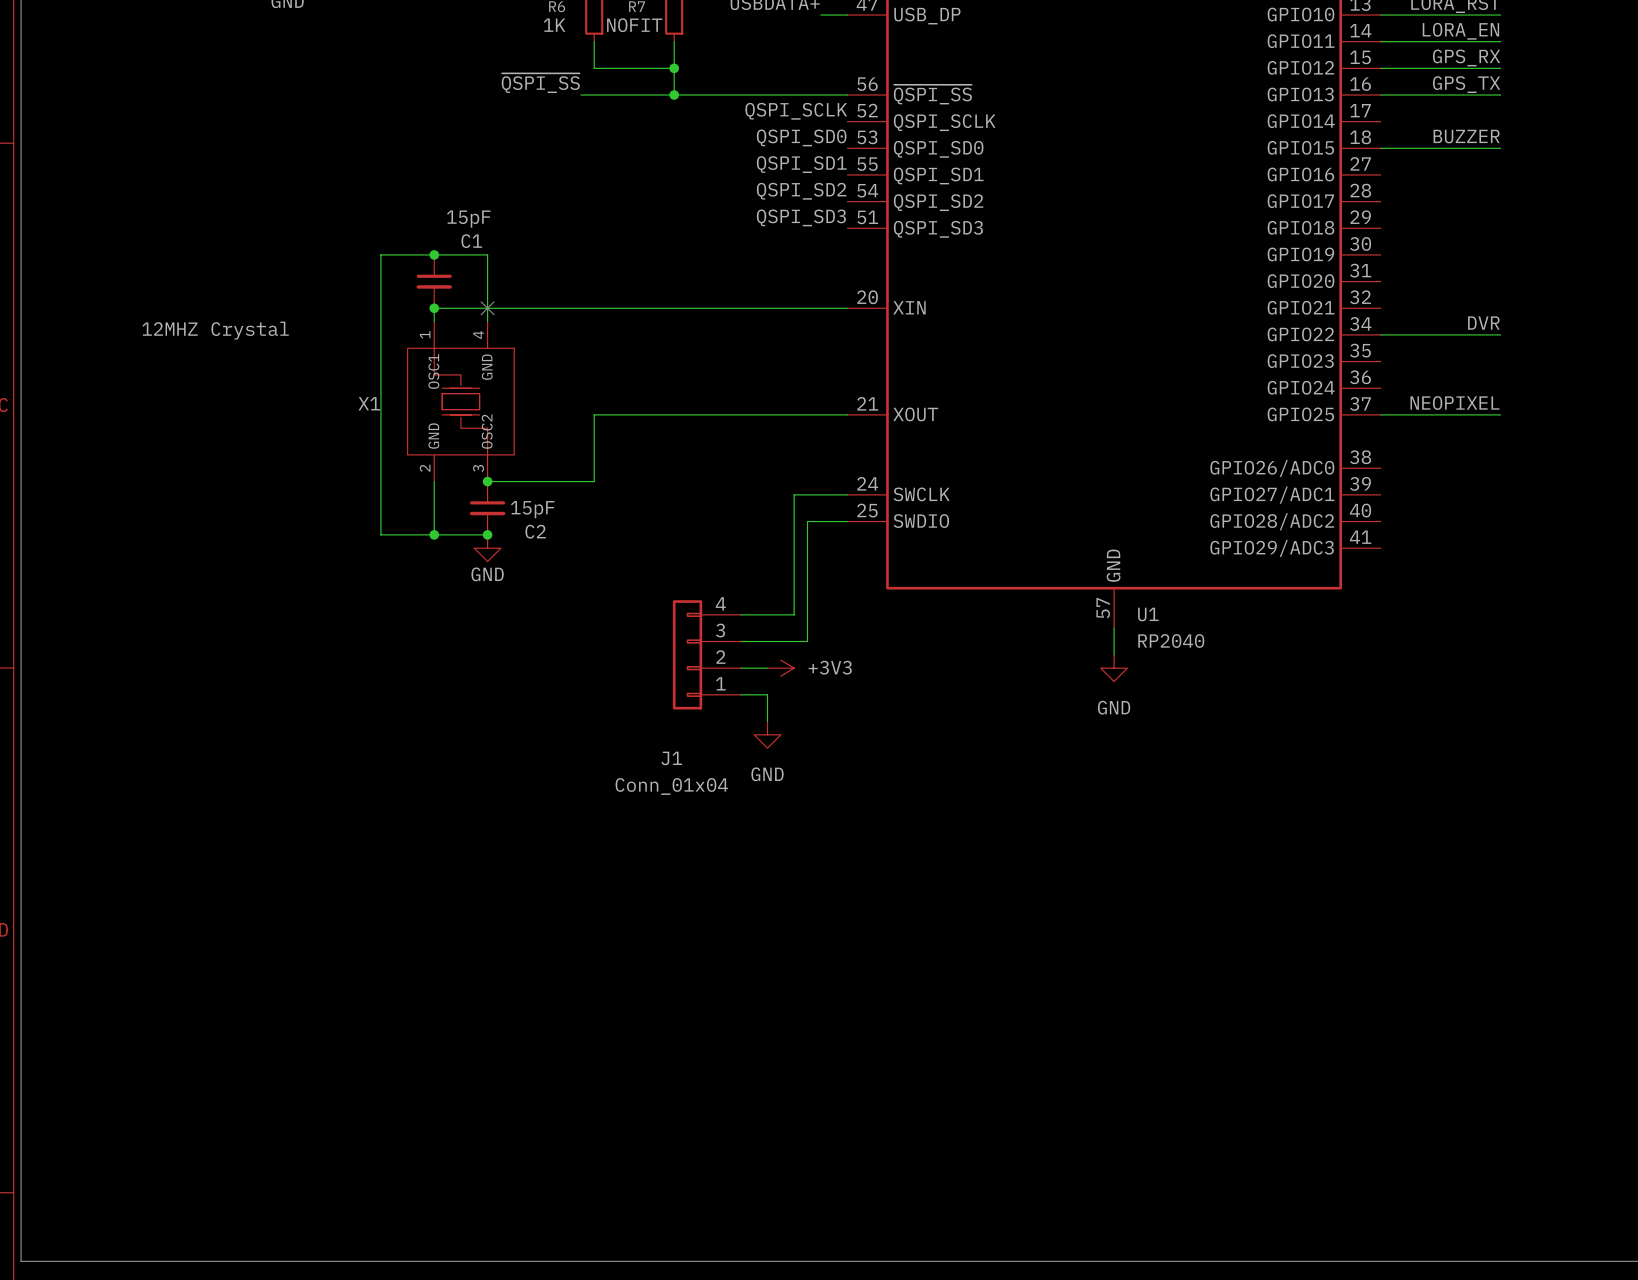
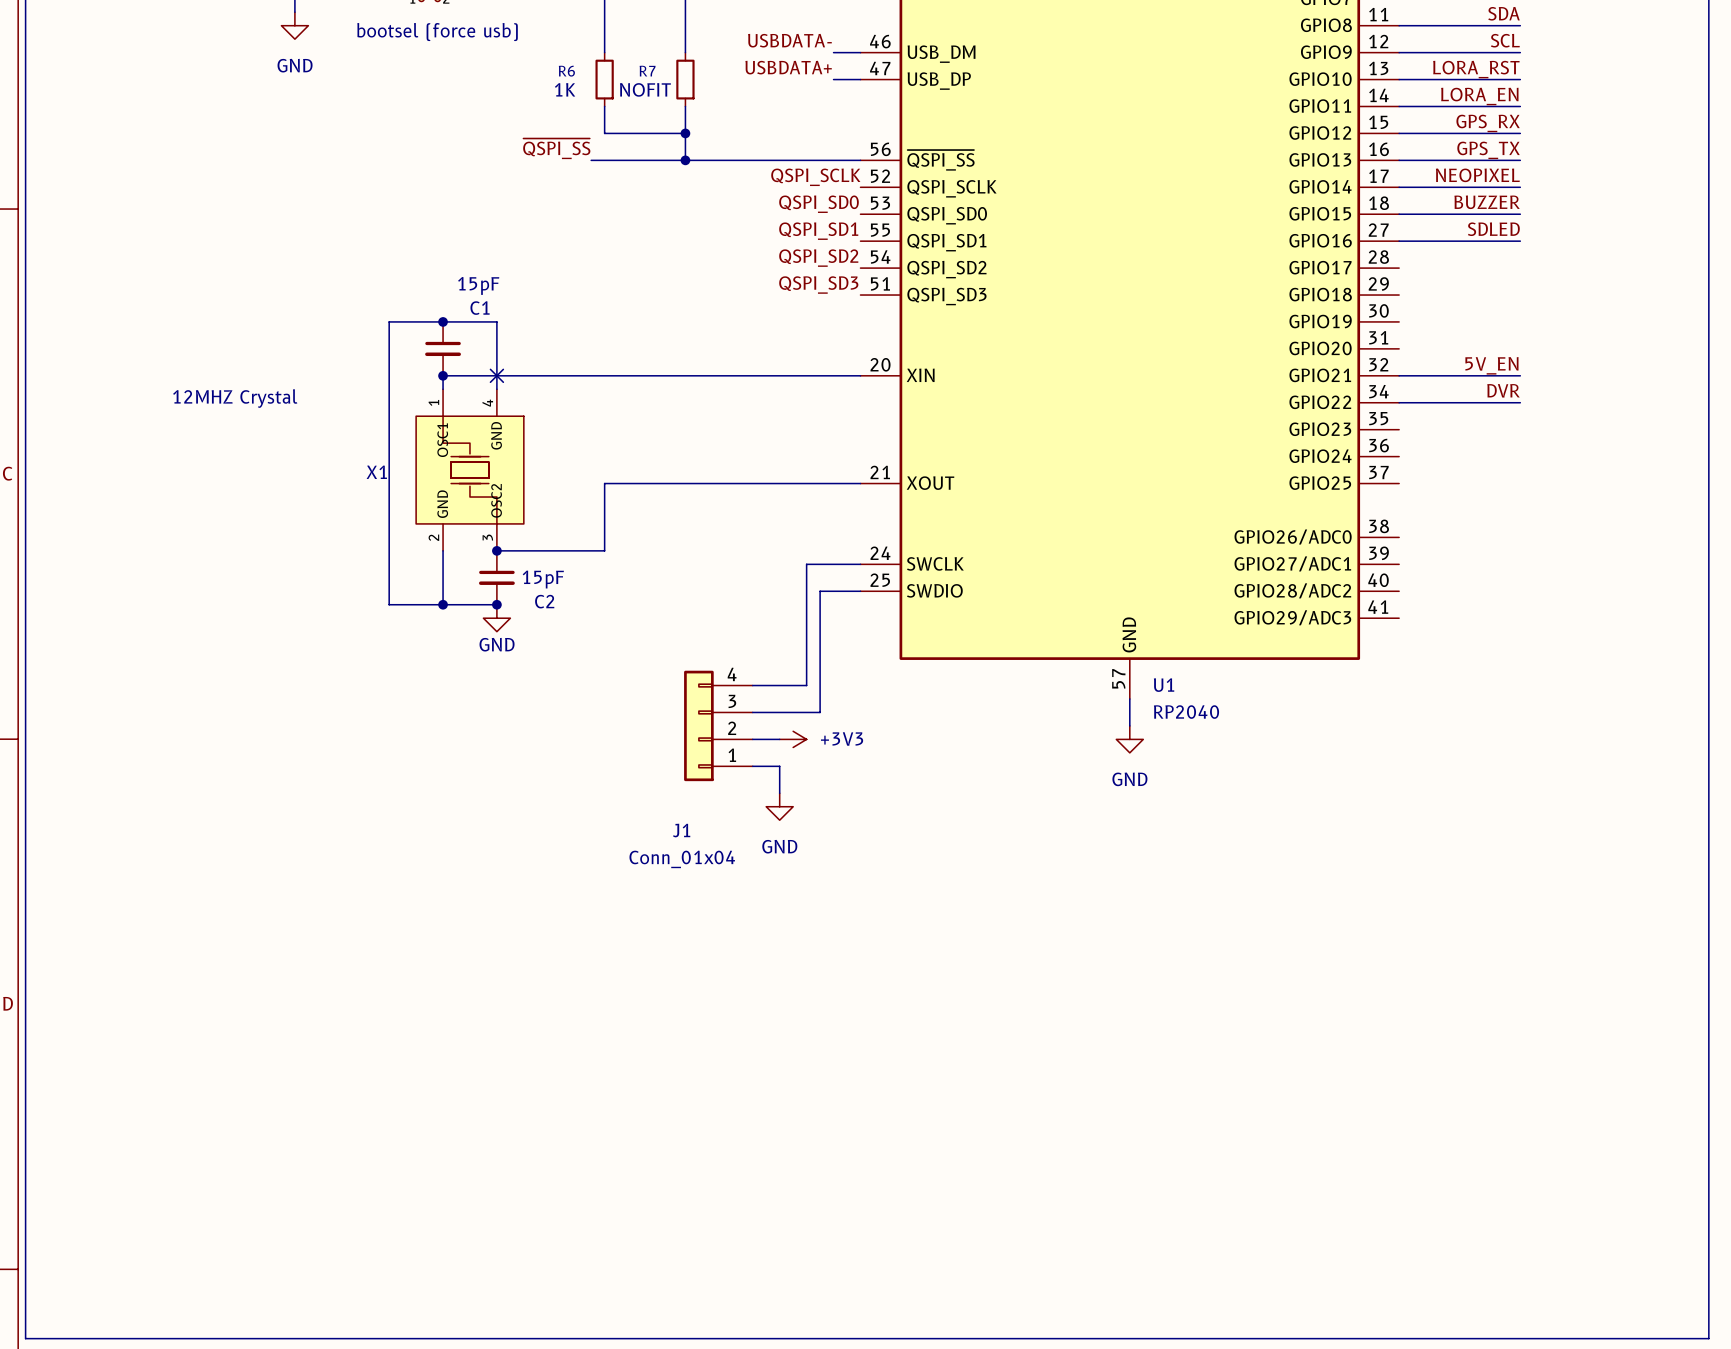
label: none -> NEOPIXEL (1477, 175)
wire: none -> (1399, 187) (1520, 187)
label: none -> SDLED (1493, 229)
wire: none -> (1399, 241) (1520, 241)
label: none -> 5V_EN (1491, 365)
label: NEOPIXEL (1454, 403) -> none
wire: (1380, 414) (1500, 414) -> (1399, 375) (1520, 375)

